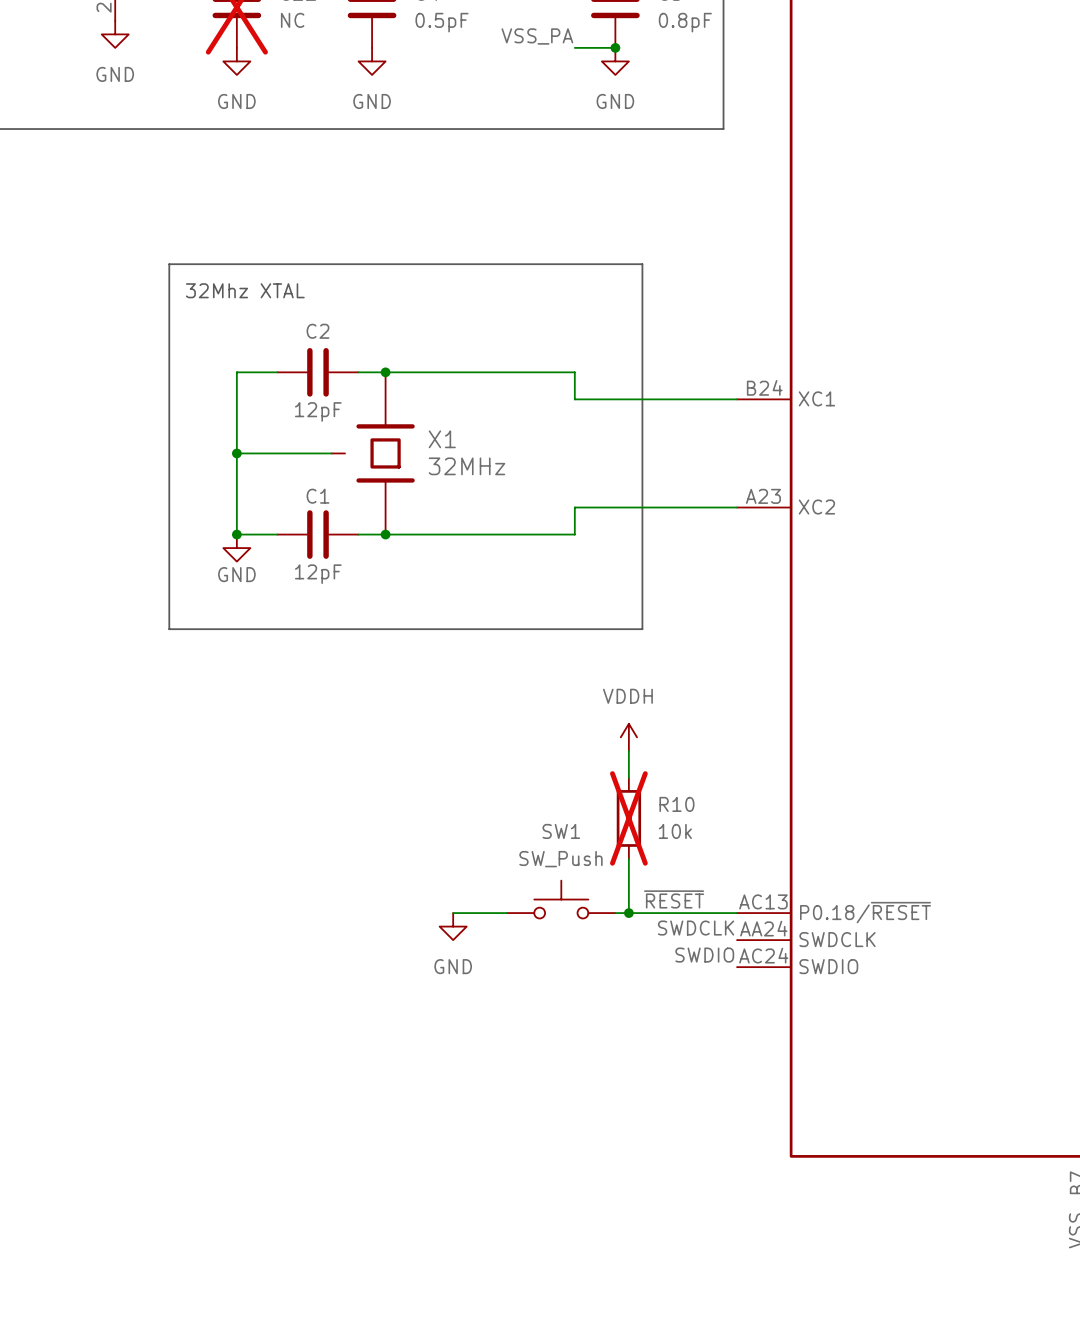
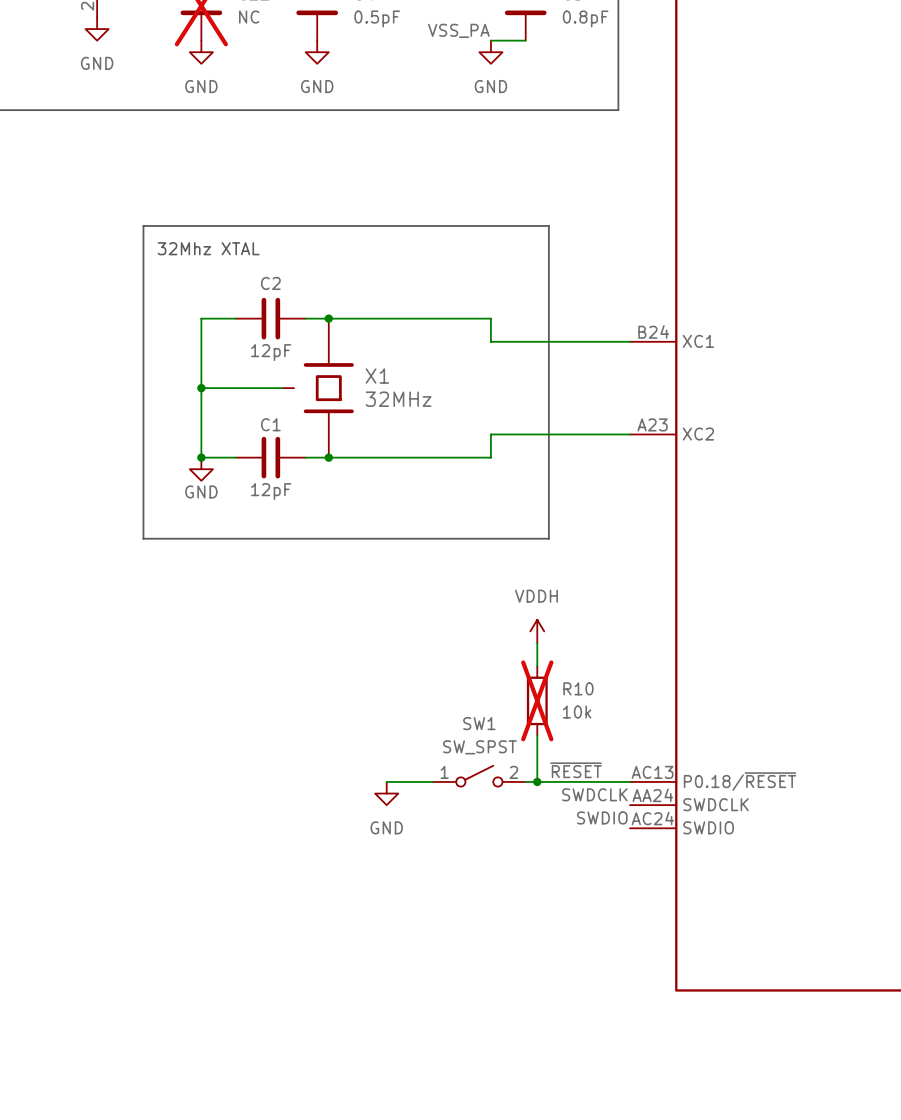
junction: (615, 47) -> none
power symbol position: GND (615, 61) -> GND (490, 52)
SW1 value: SW_Push (560, 859) -> SW_SPST (479, 747)
SW1 symbol: [507, 880, 616, 919] -> [433, 765, 526, 787]

